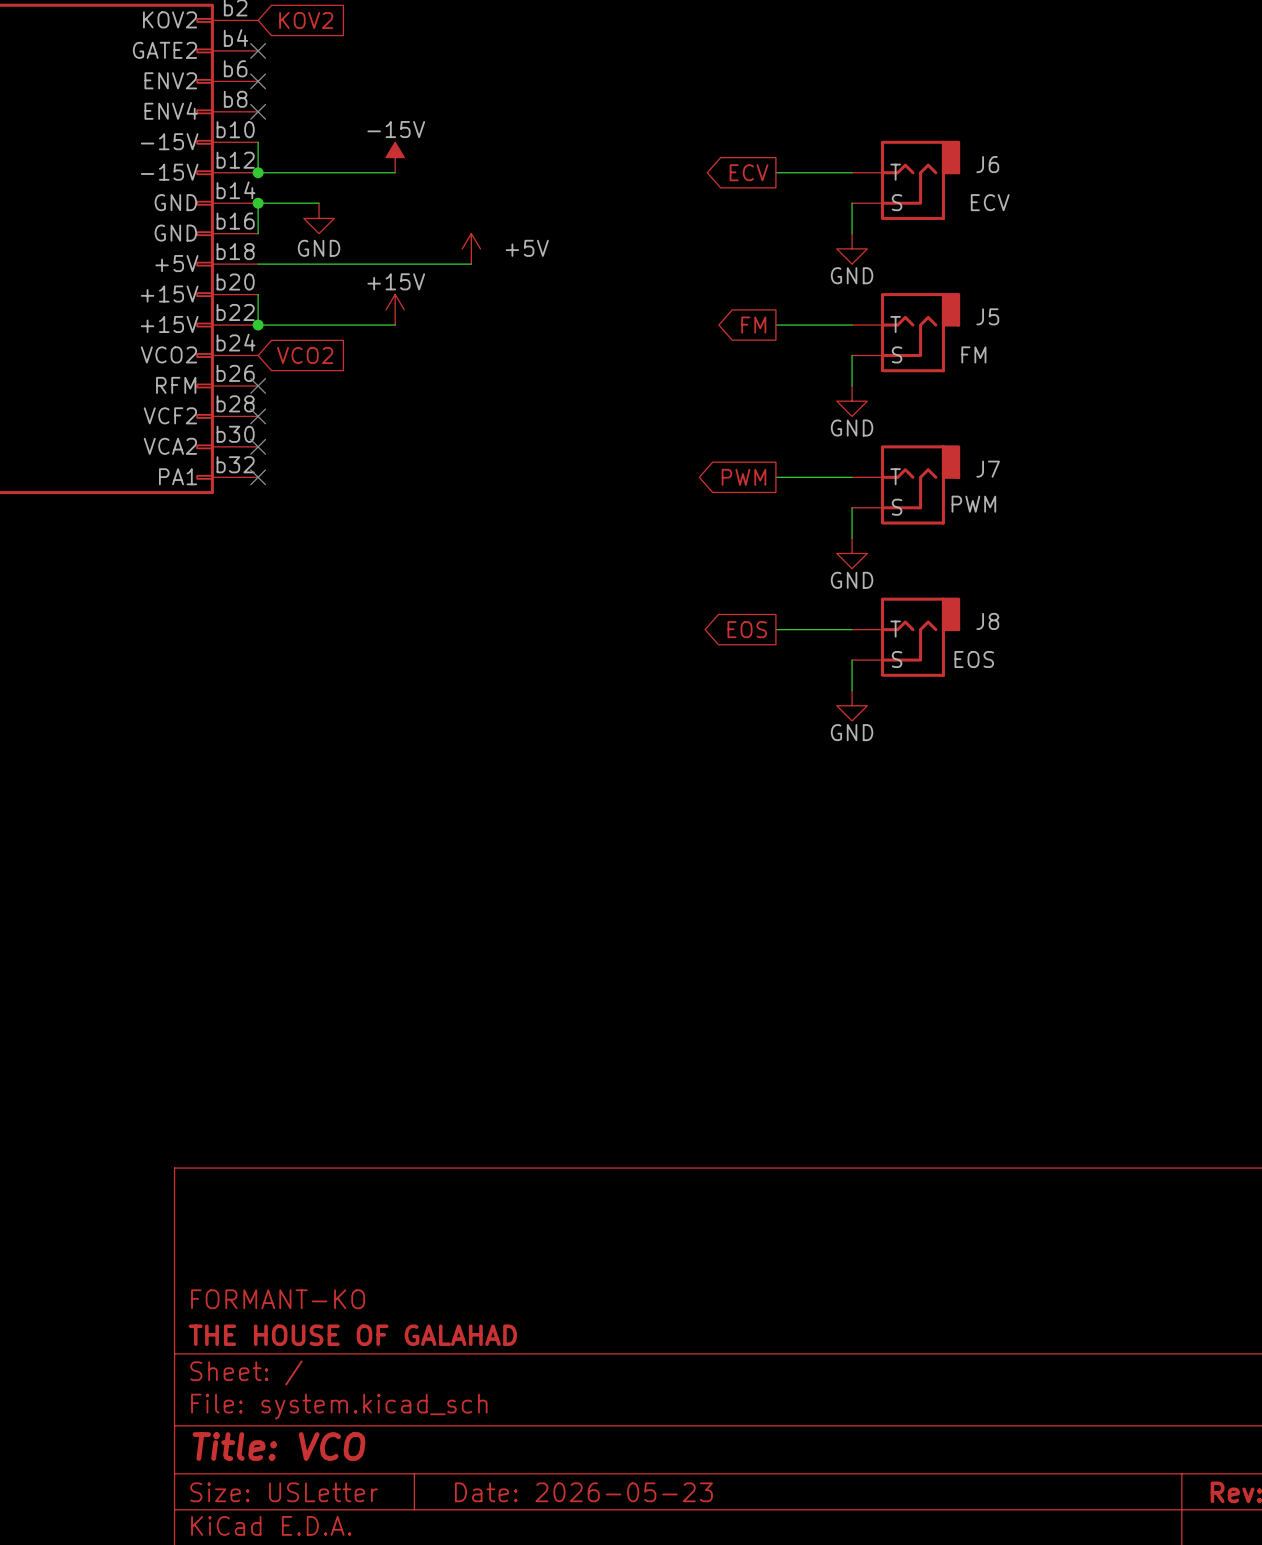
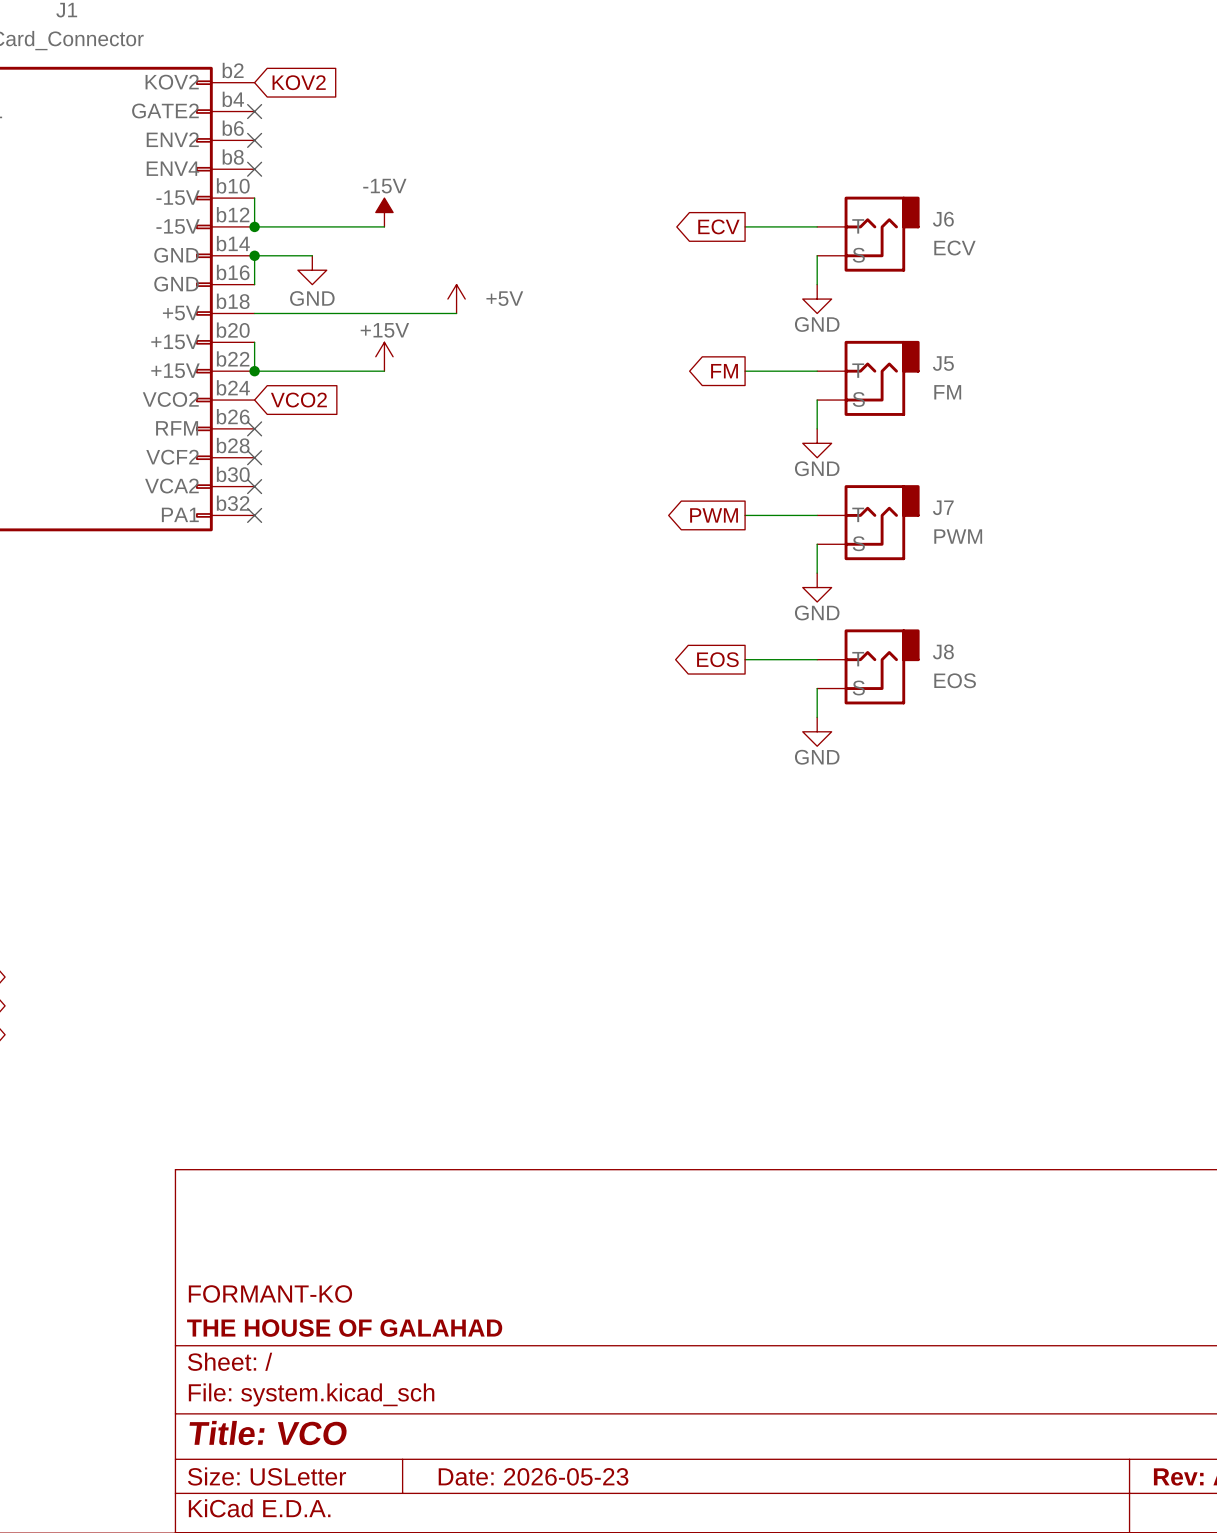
J6 text: none -> ECV (954, 248)
J6 value: ECV (990, 202) -> none
J5 text: none -> FM (947, 392)
J5 value: FM (973, 354) -> none
J7 text: none -> PWM (958, 536)
J7 value: PWM (973, 504) -> none
J8 text: none -> EOS (955, 680)
J8 value: EOS (974, 659) -> none

